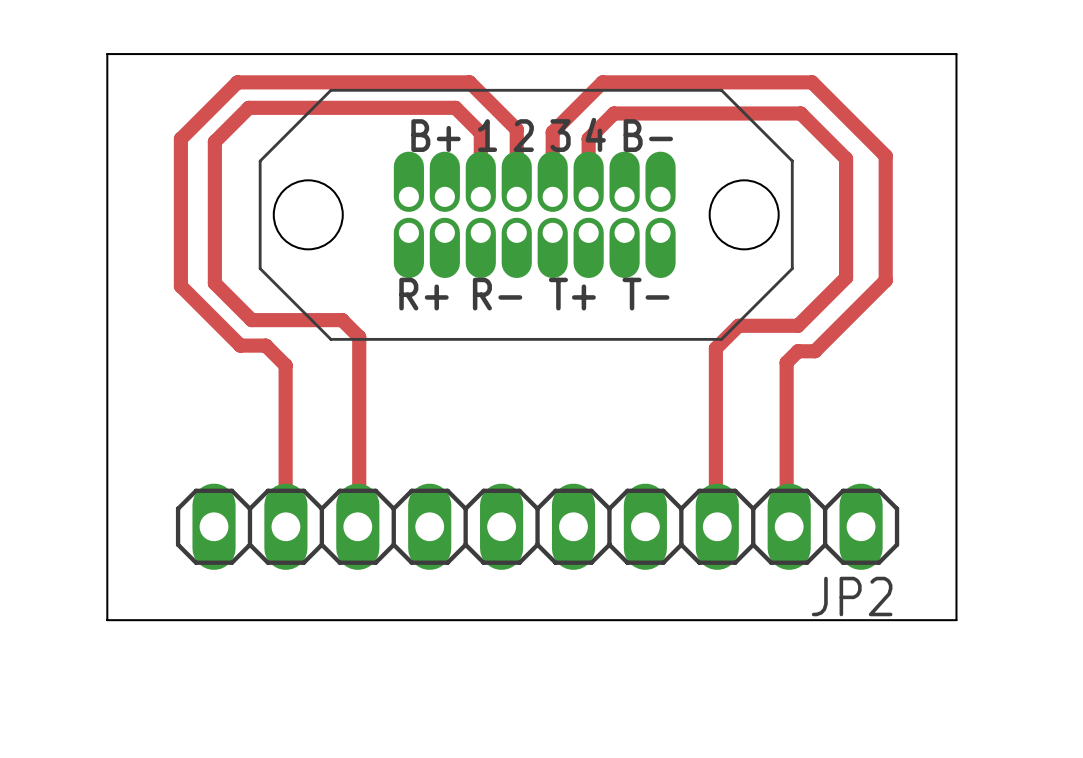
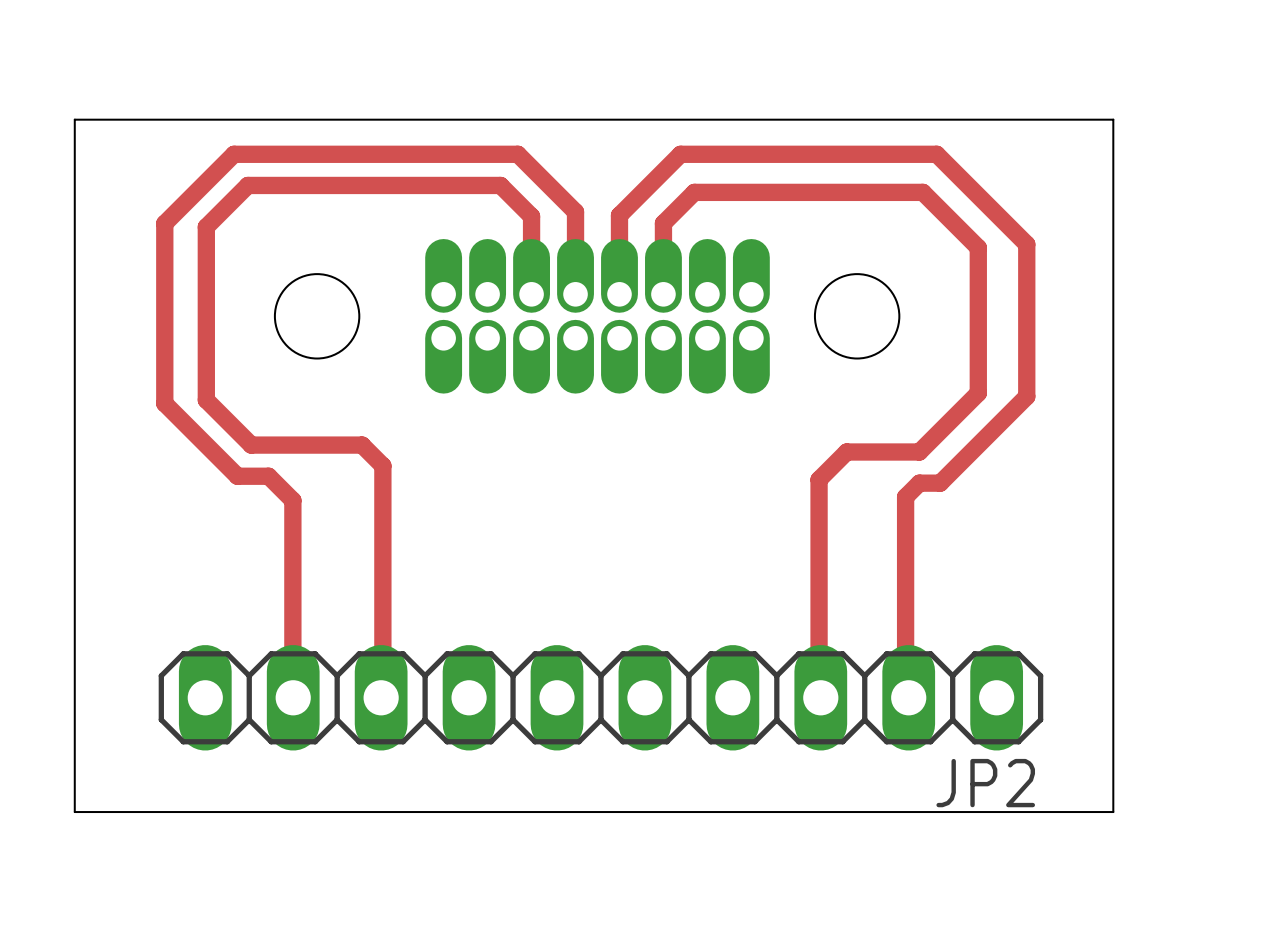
part footprint: [258, 88, 794, 341] -> [274, 239, 900, 394]

